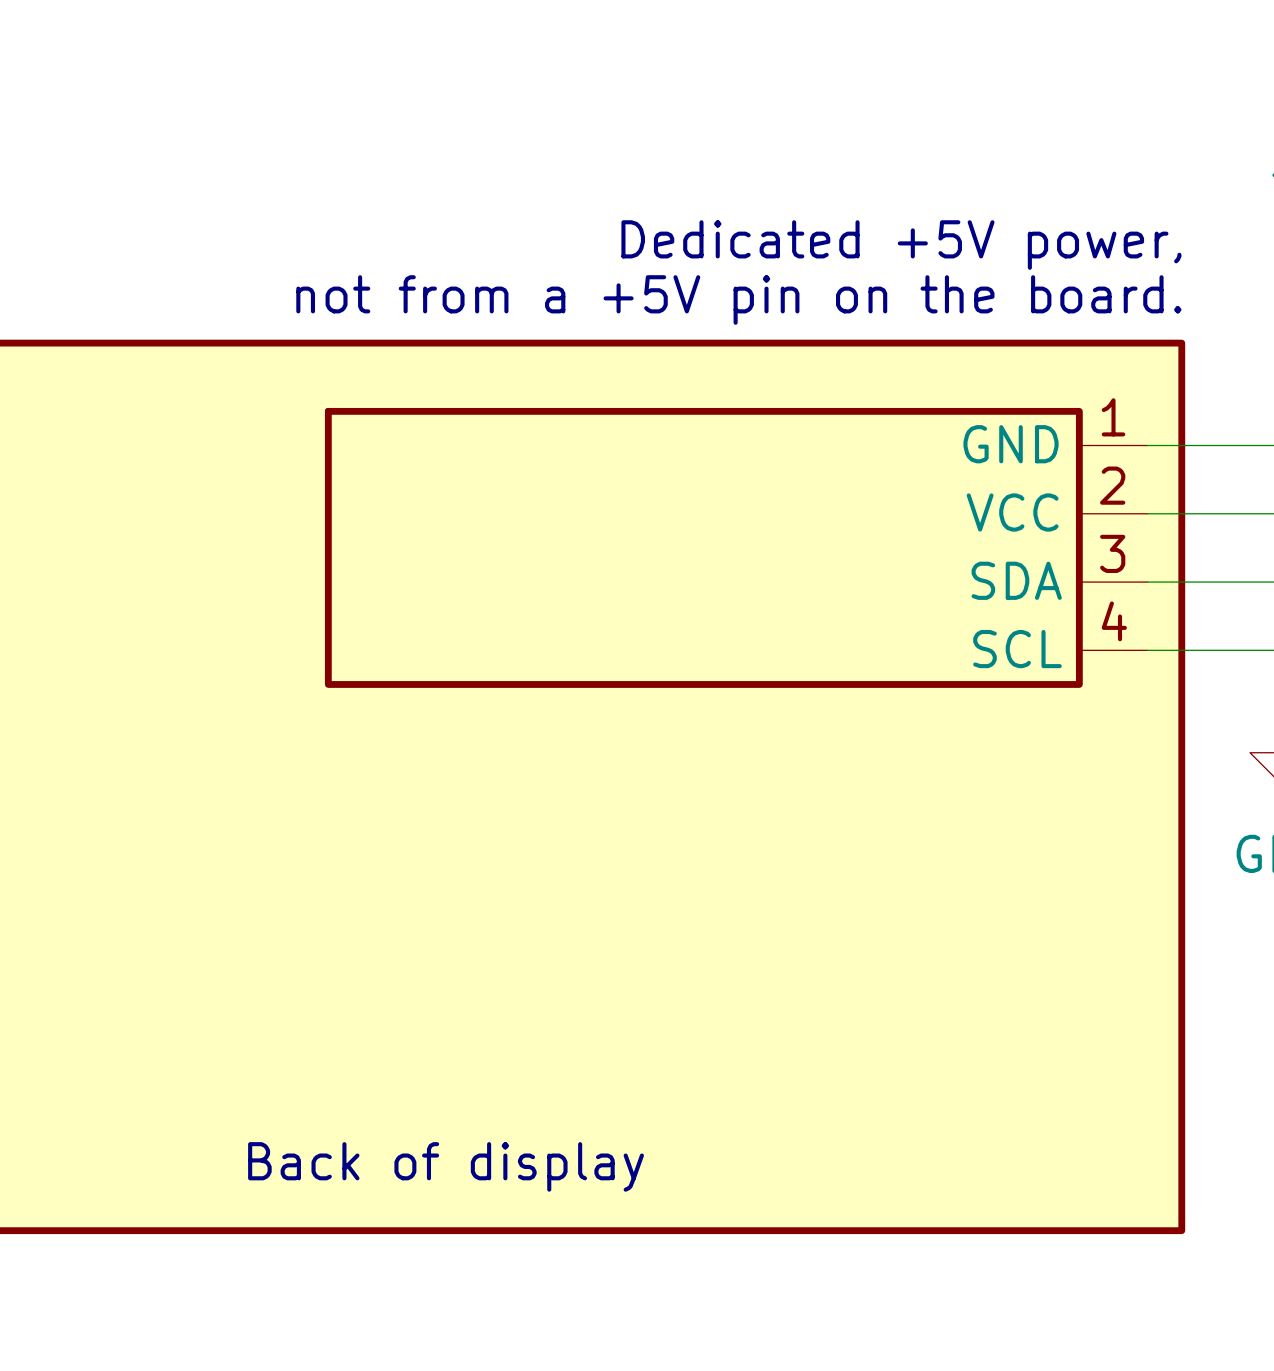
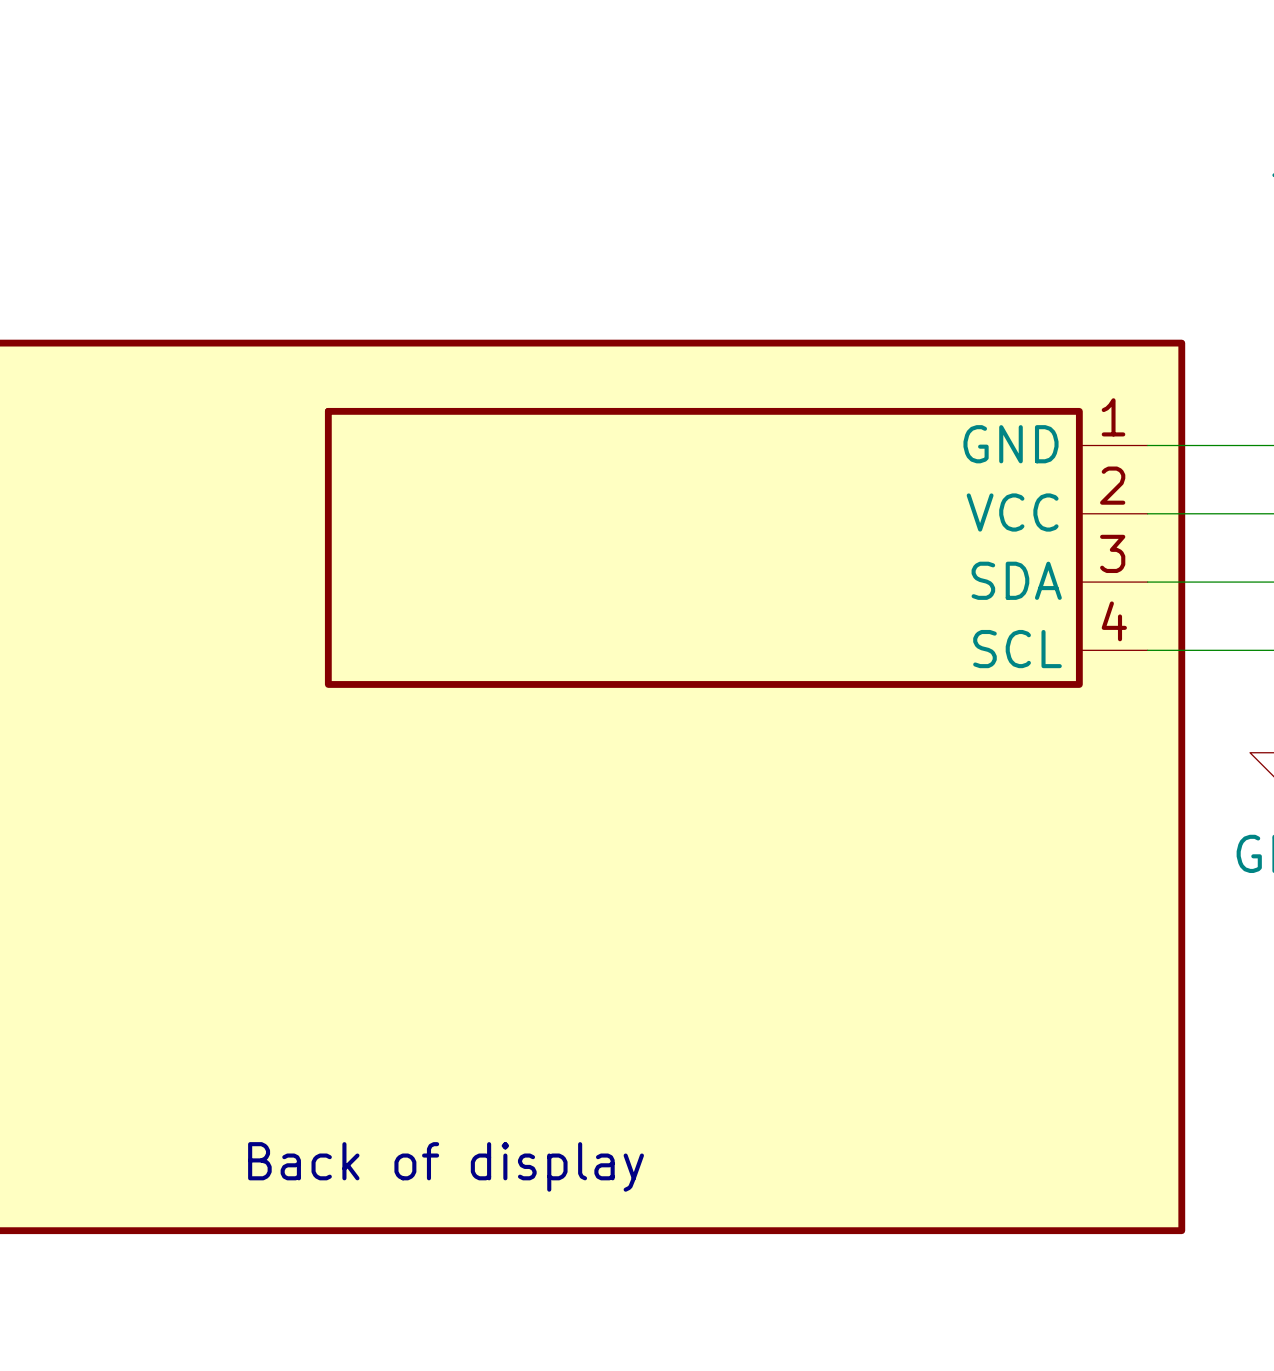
text: Dedicated +5V power, (901, 245) -> none
text: not from a +5V pin on the board. (738, 299) -> none

